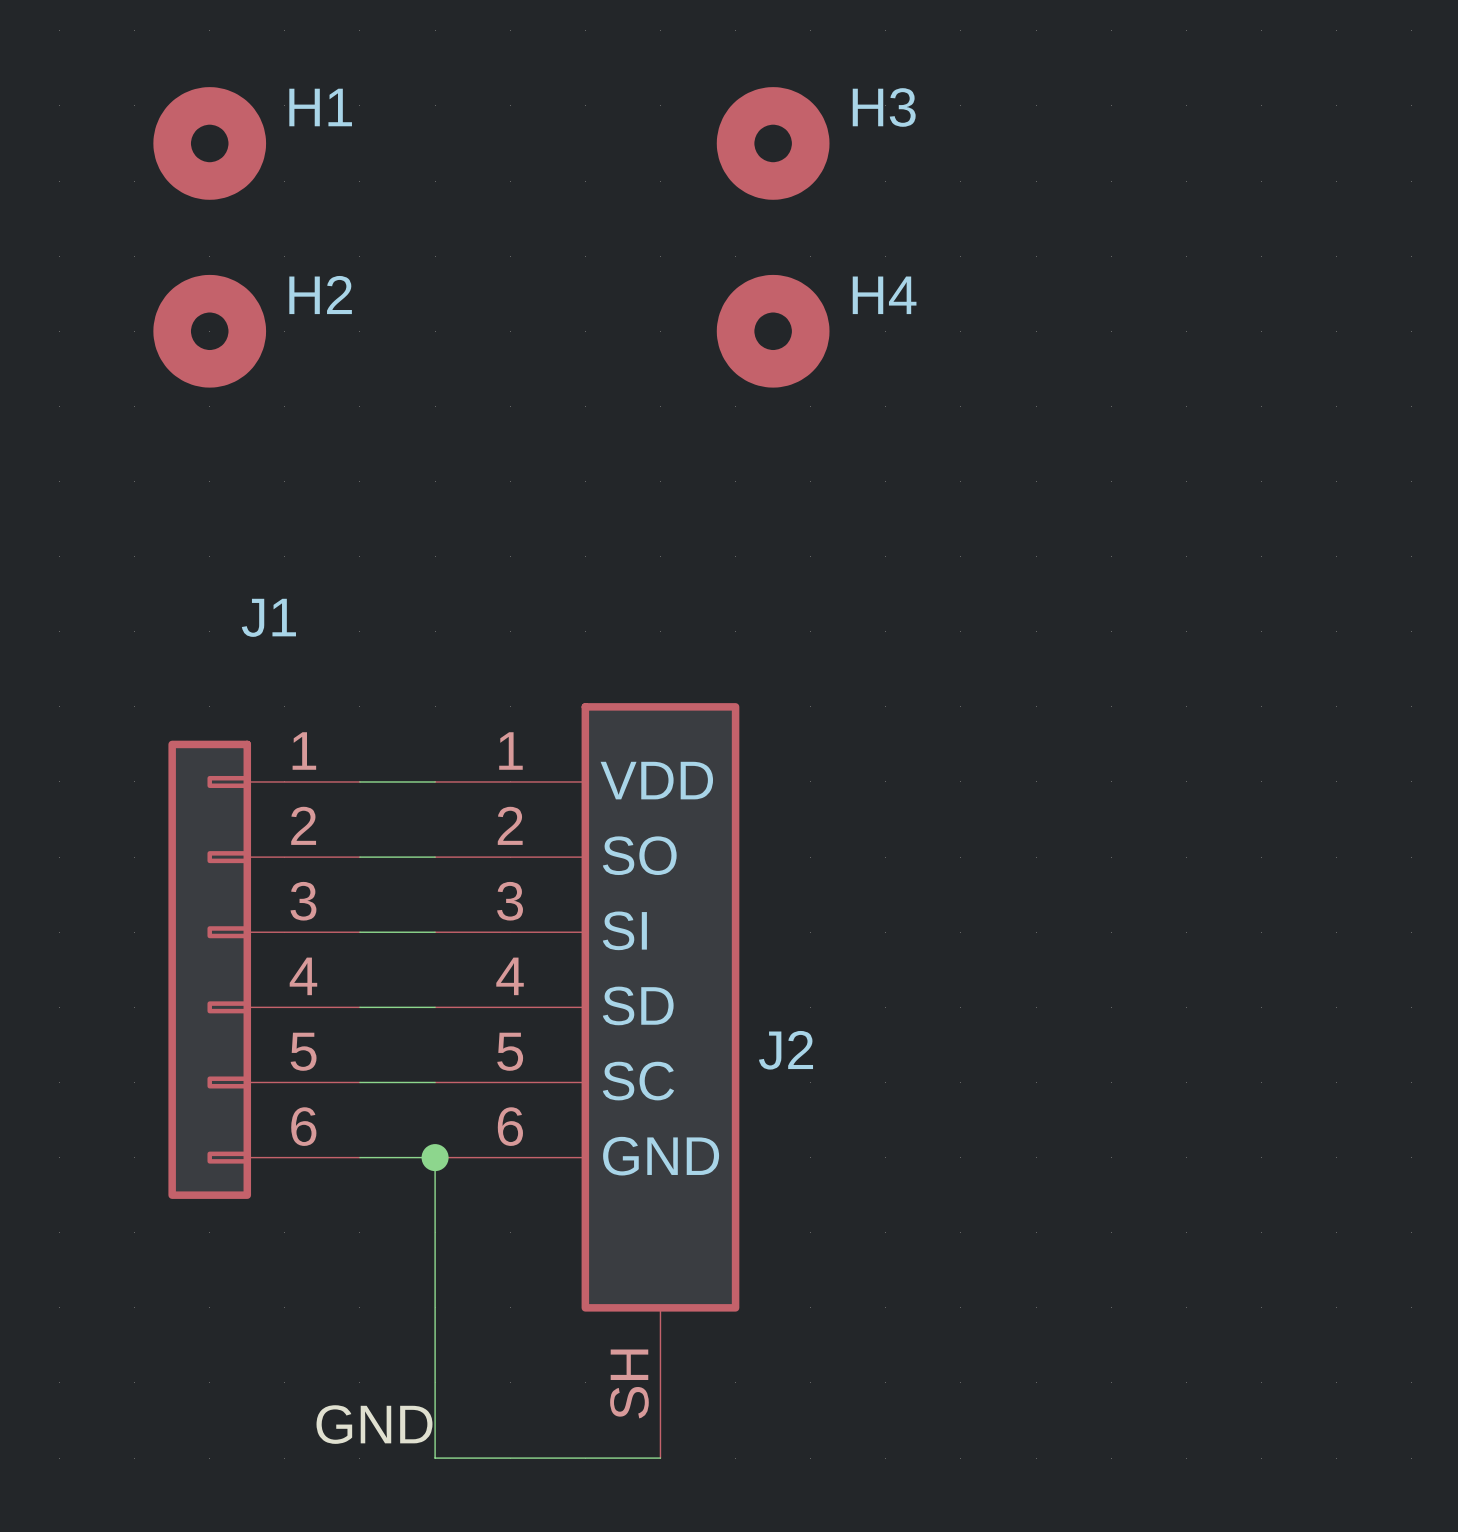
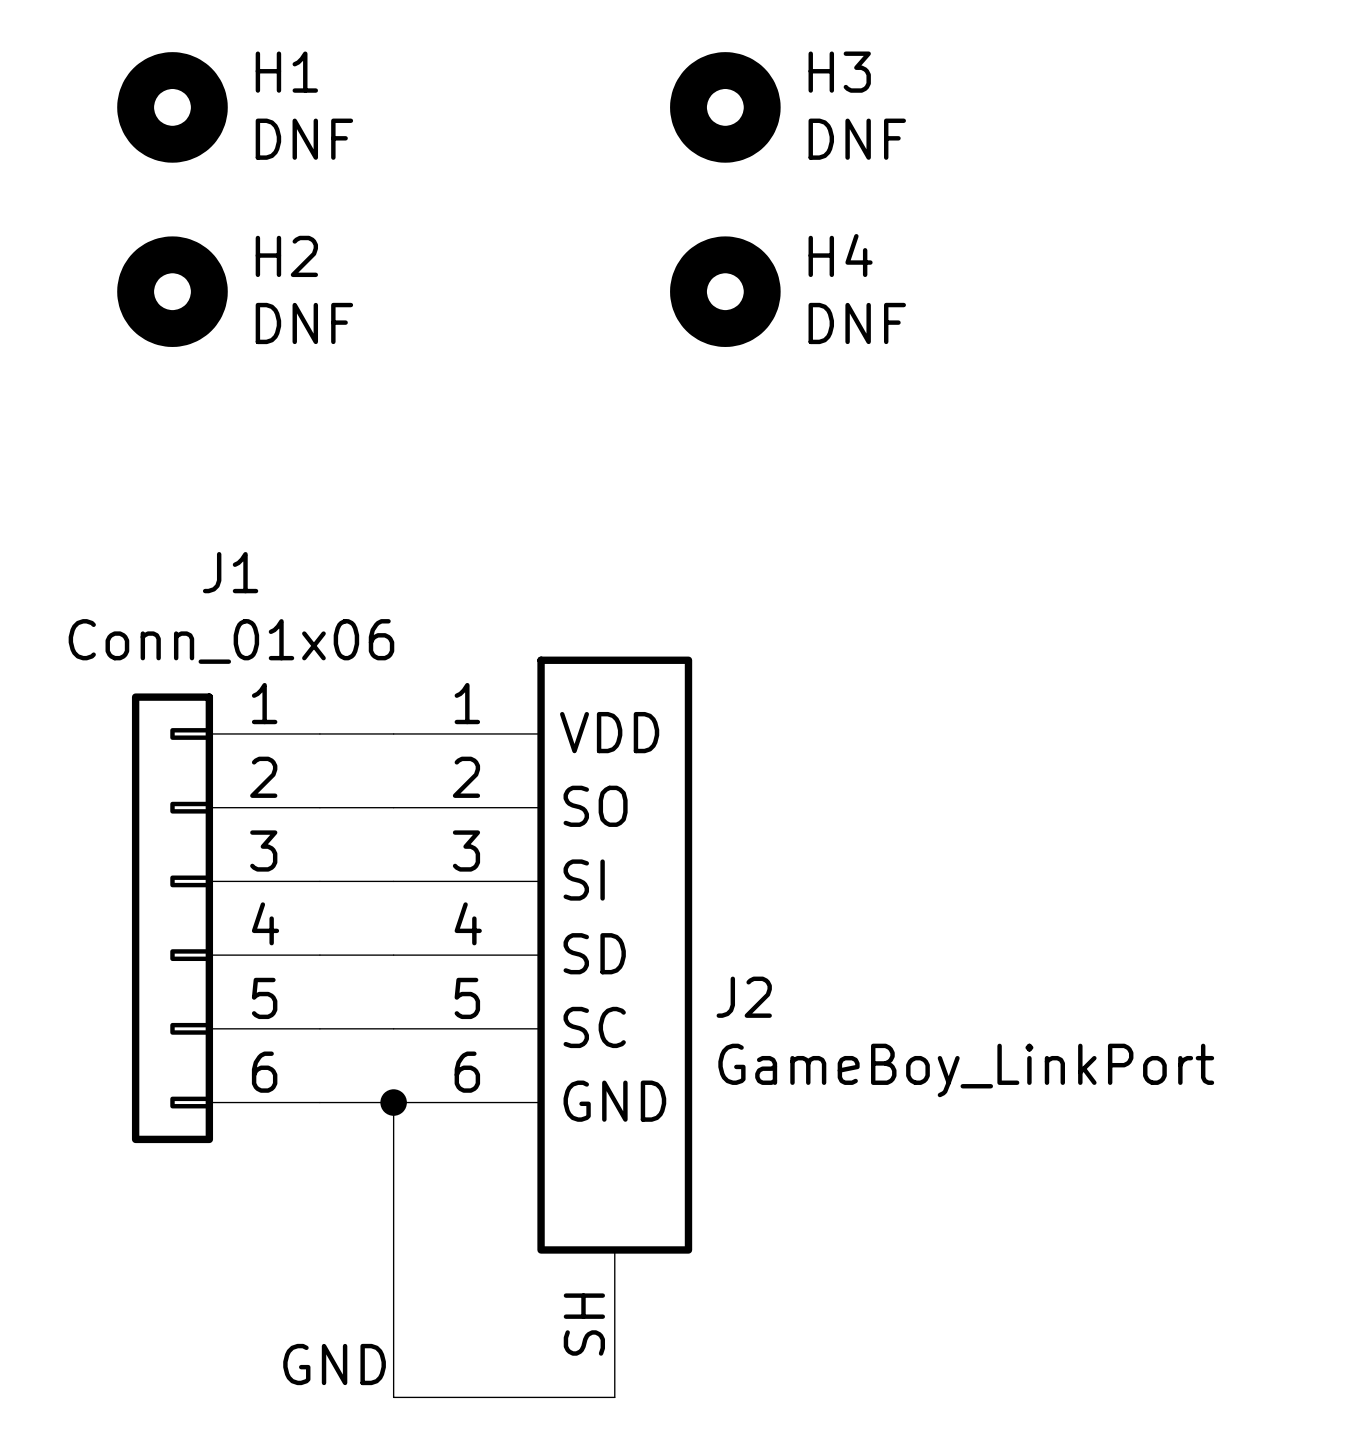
H1 value: none -> DNF (304, 139)
H3 value: none -> DNF (857, 139)
H2 value: none -> DNF (304, 323)
H4 value: none -> DNF (857, 323)
J1 value: none -> Conn_01x06 (231, 641)
J2 value: none -> GameBoy_LinkPort (966, 1070)

